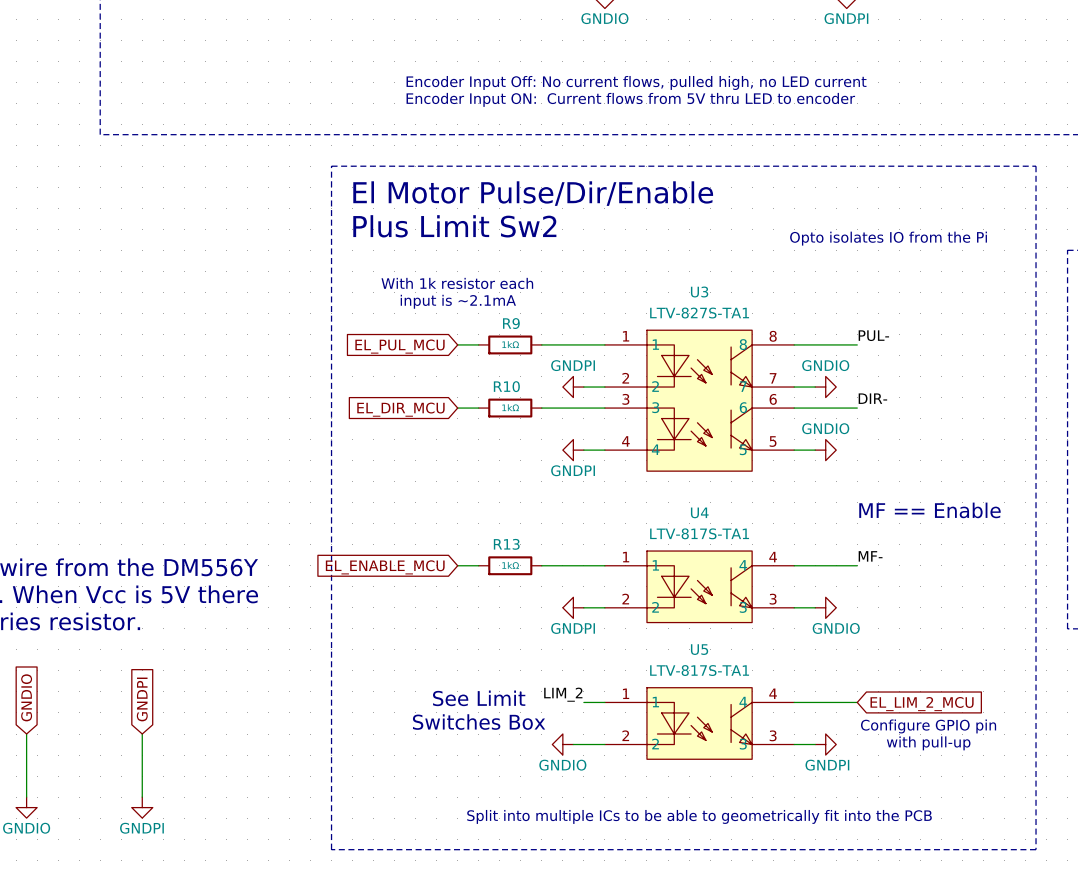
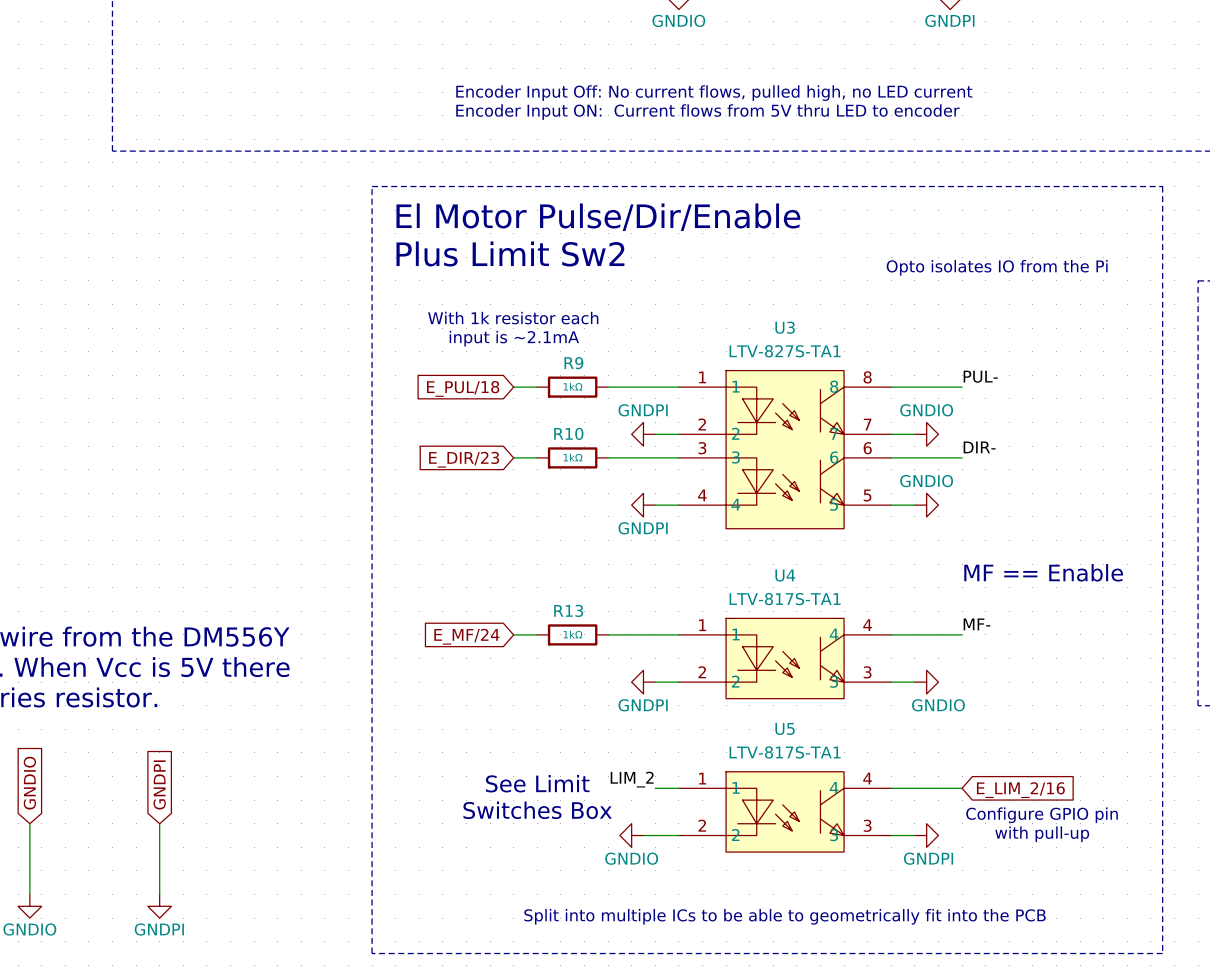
global label: EL_PUL_MCU (399, 346) -> E_PUL/18 (463, 388)
global label: EL_DIR_MCU (400, 409) -> E_DIR/23 (464, 459)
global label: EL_ENABLE_MCU (385, 567) -> E_MF/24 (466, 636)
global label: EL_LIM_2_MCU (922, 704) -> E_LIM_2/16 (1020, 790)

